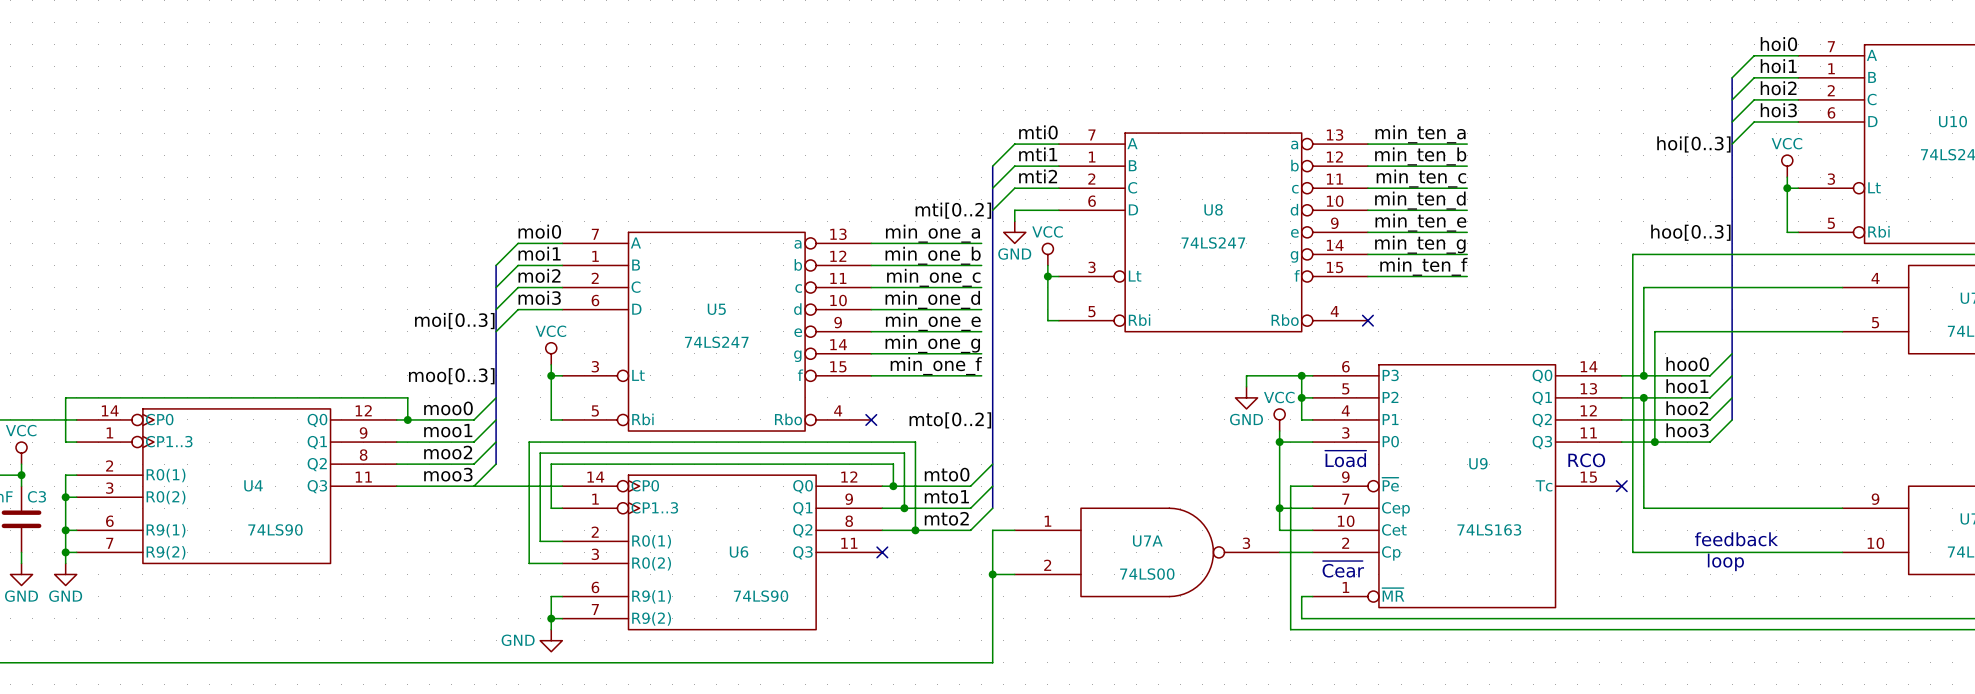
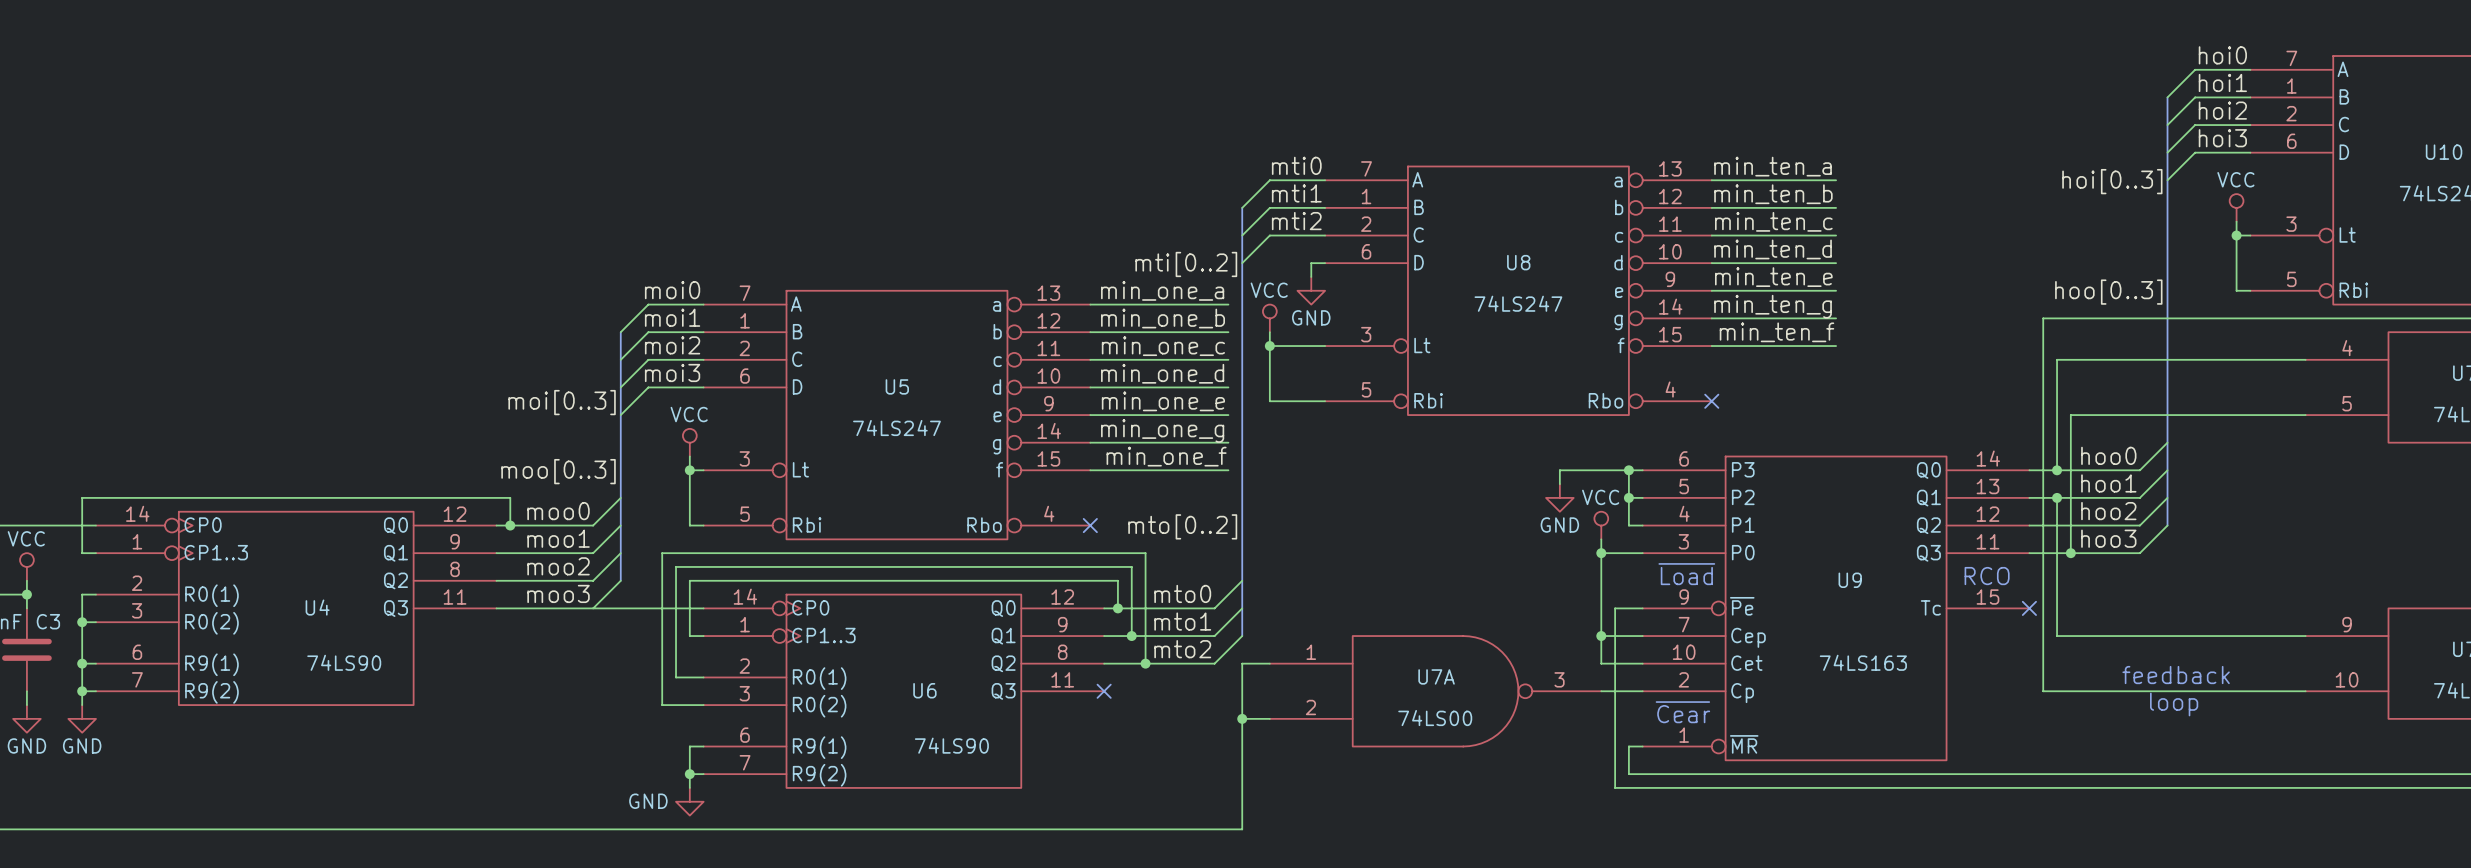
wire: (1047, 210) (1014, 210) (1014, 221) -> (1311, 263) (1311, 276)
power symbol position: GND (1014, 232) -> GND (1311, 290)
power symbol position: VCC (1047, 254) -> VCC (1269, 318)
wire: (1047, 265) (1047, 320) -> (1269, 332) (1269, 401) (1311, 401)
wire: none -> (1269, 346) (1311, 346)
junction position: (1047, 276) -> (1269, 346)

